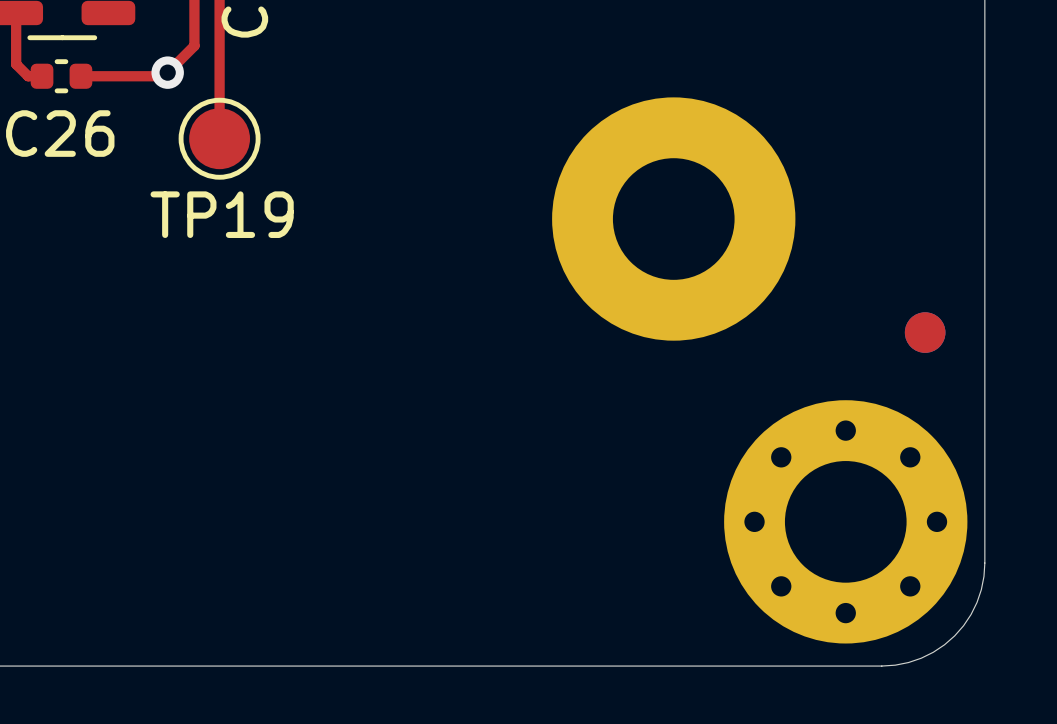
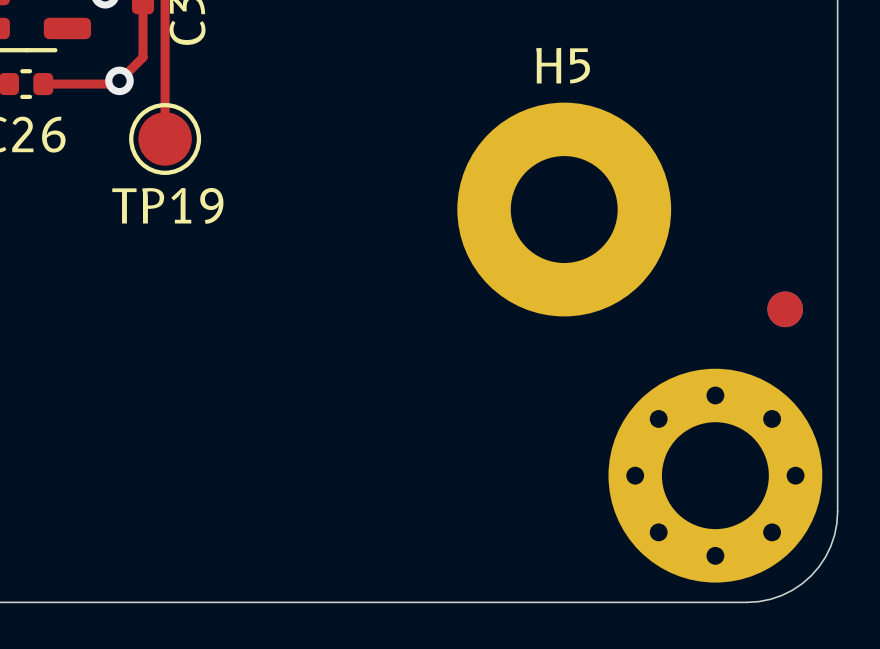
H5 name: none -> H5 (563, 65)

